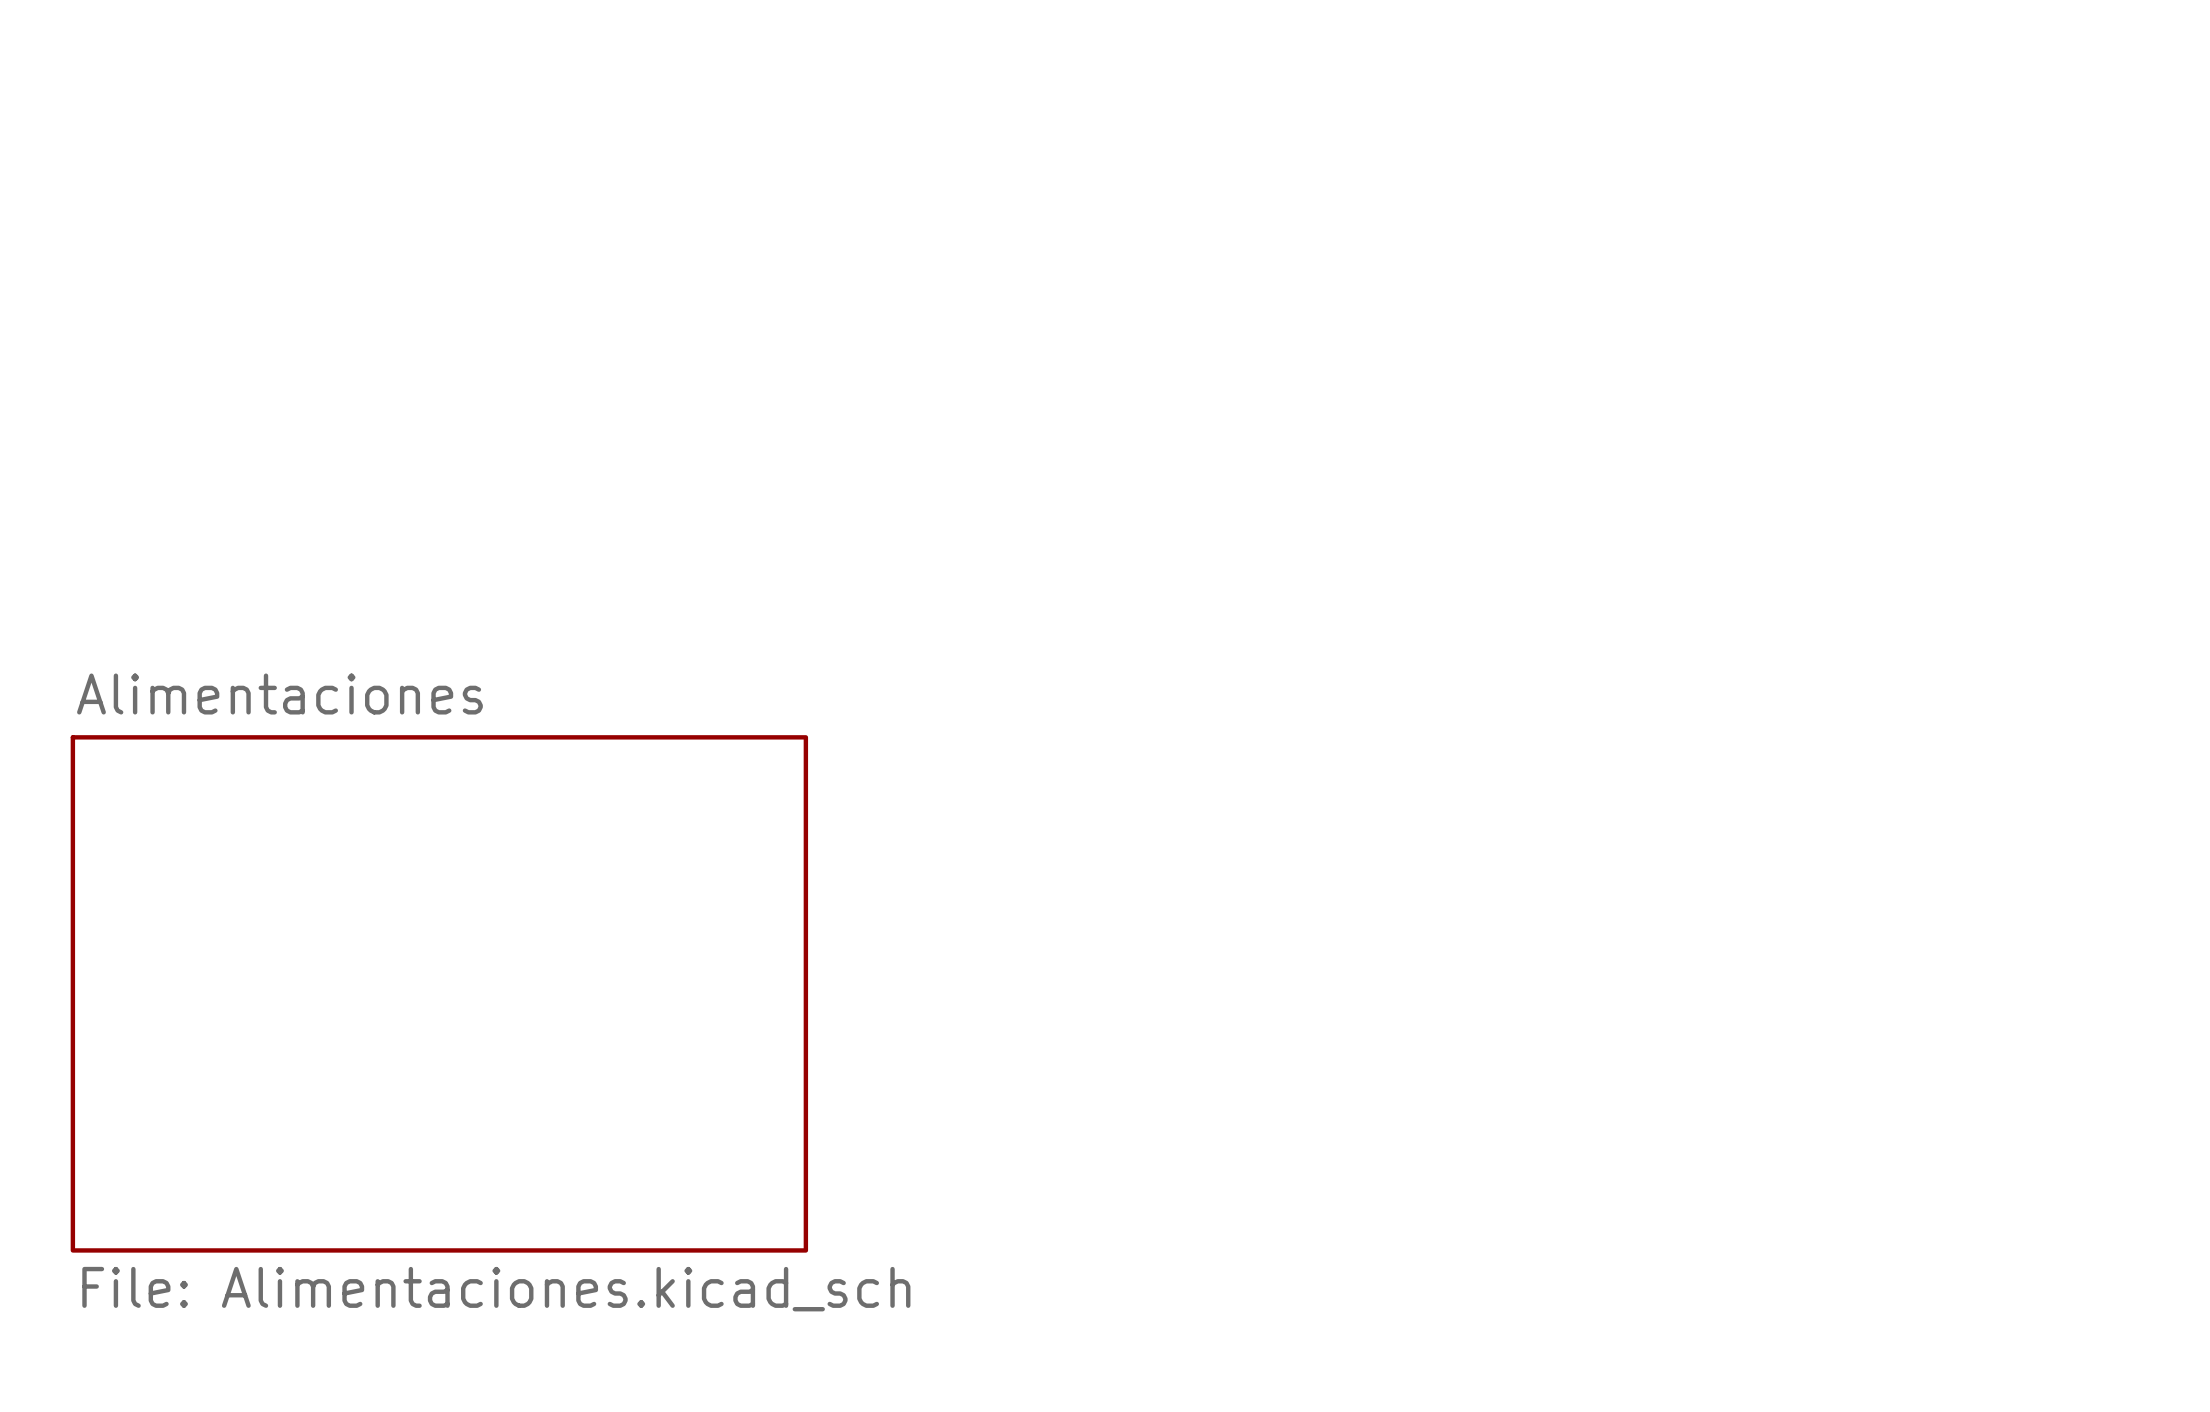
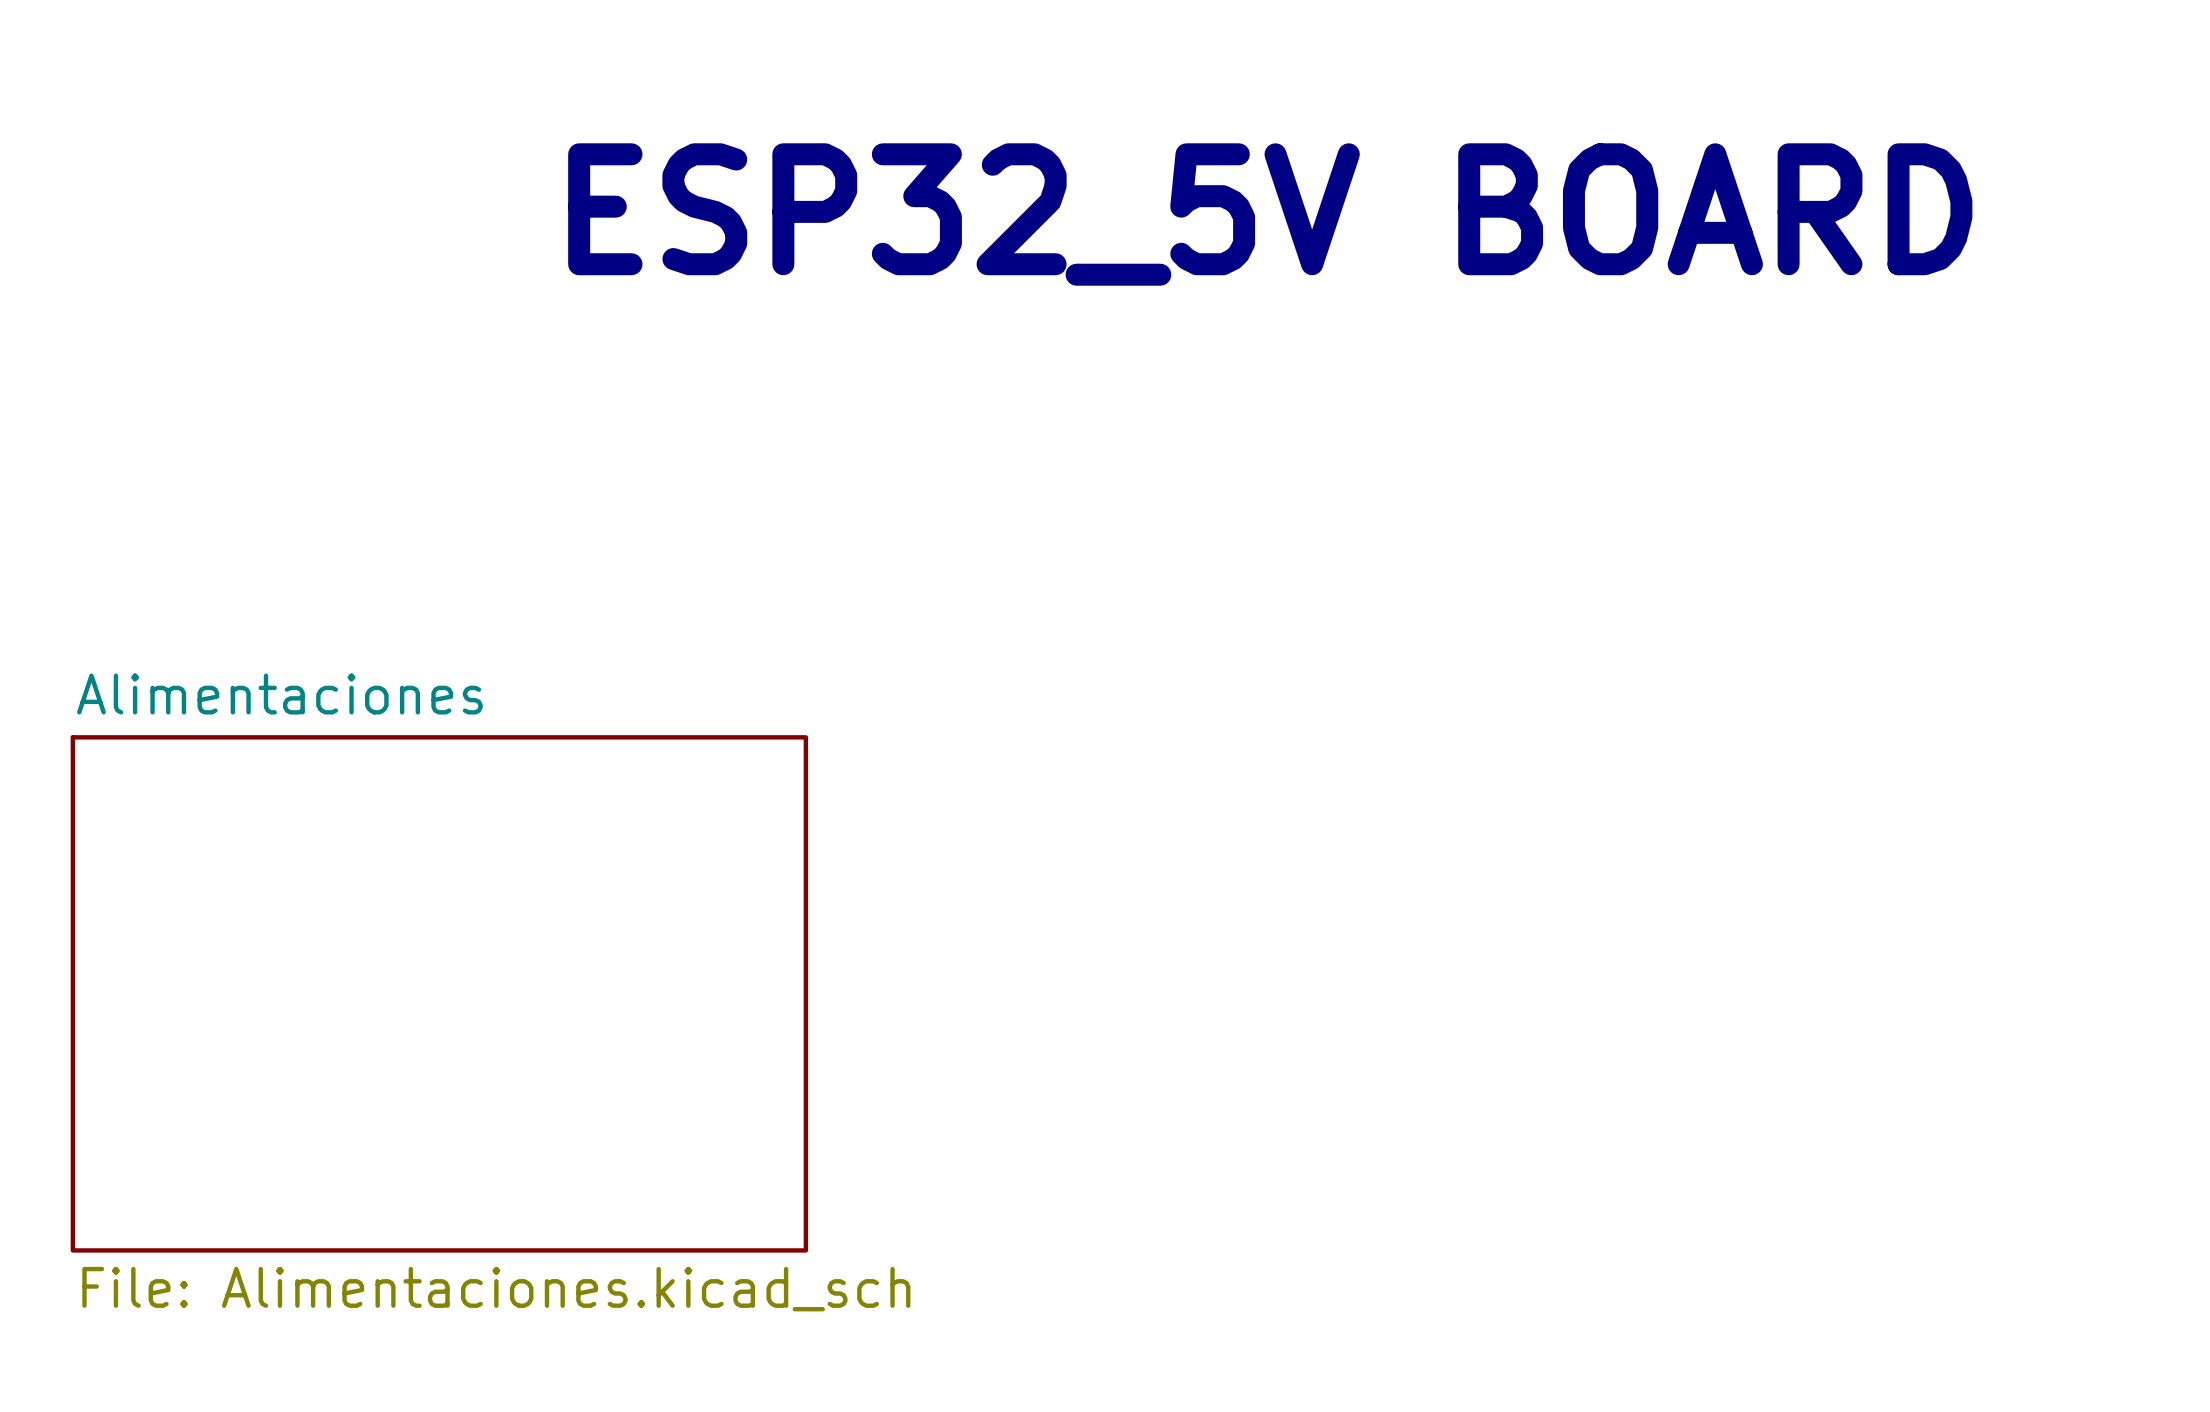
text: none -> ESP32_5V BOARD (1270, 214)

